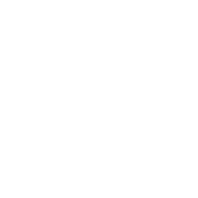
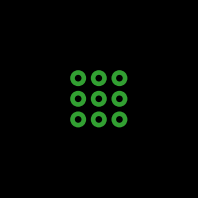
part: none -> (98, 98)

